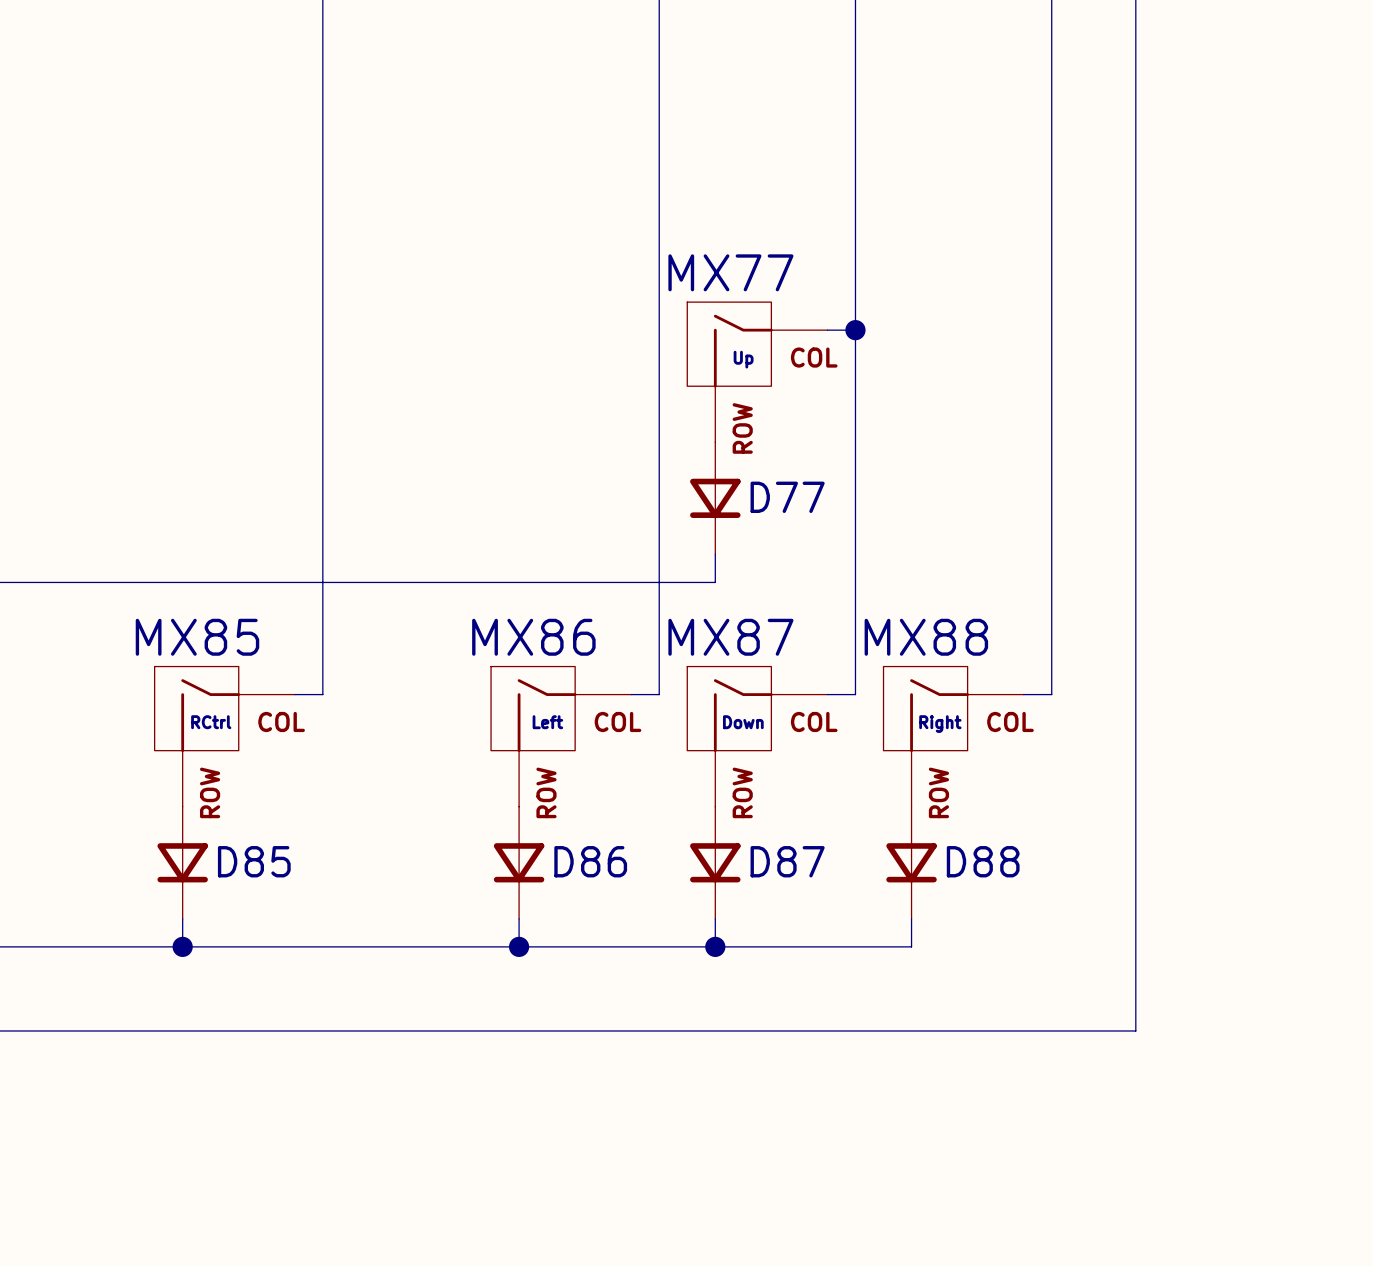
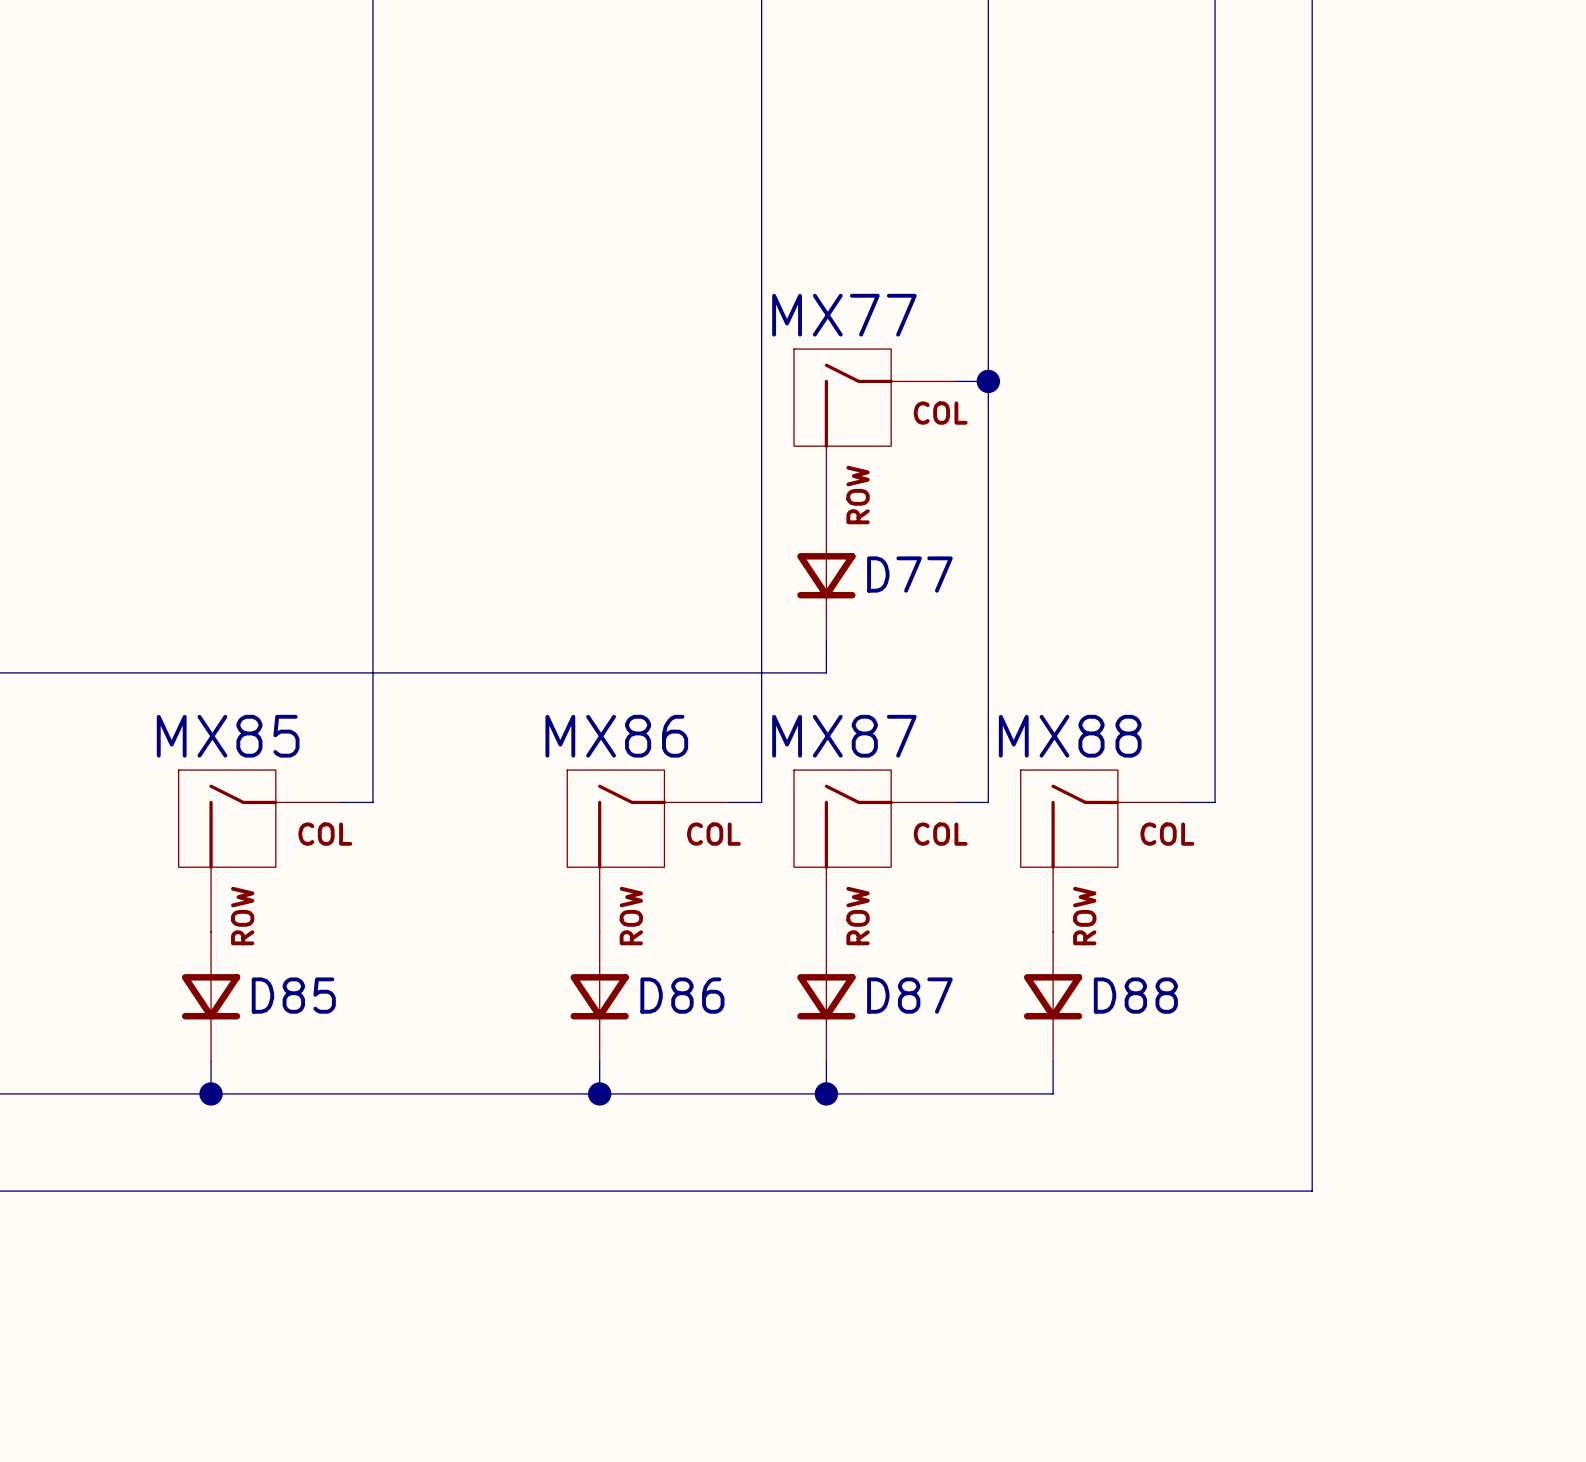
MX77 value: Up (743, 359) -> none
MX85 value: RCtrl (211, 722) -> none
MX86 value: Left (547, 722) -> none
MX87 value: Down (743, 722) -> none
MX88 value: Right (940, 724) -> none

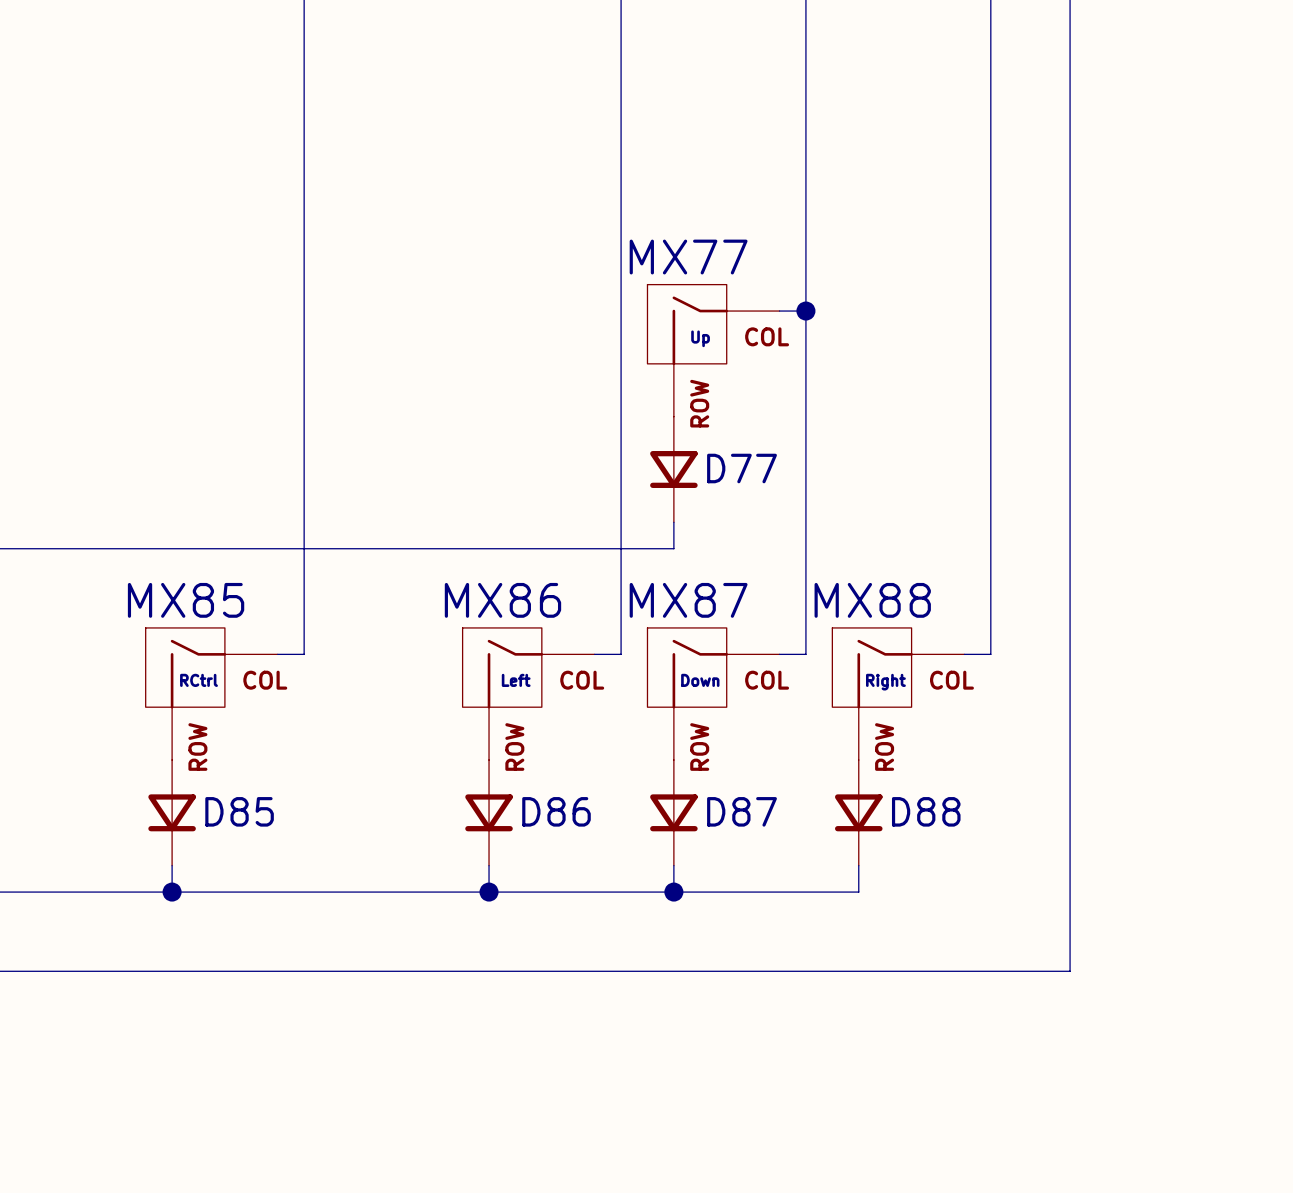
MX77 value: none -> Up (700, 338)
MX85 value: none -> RCtrl (199, 680)
MX86 value: none -> Left (516, 680)
MX87 value: none -> Down (700, 680)
MX88 value: none -> Right (885, 682)

